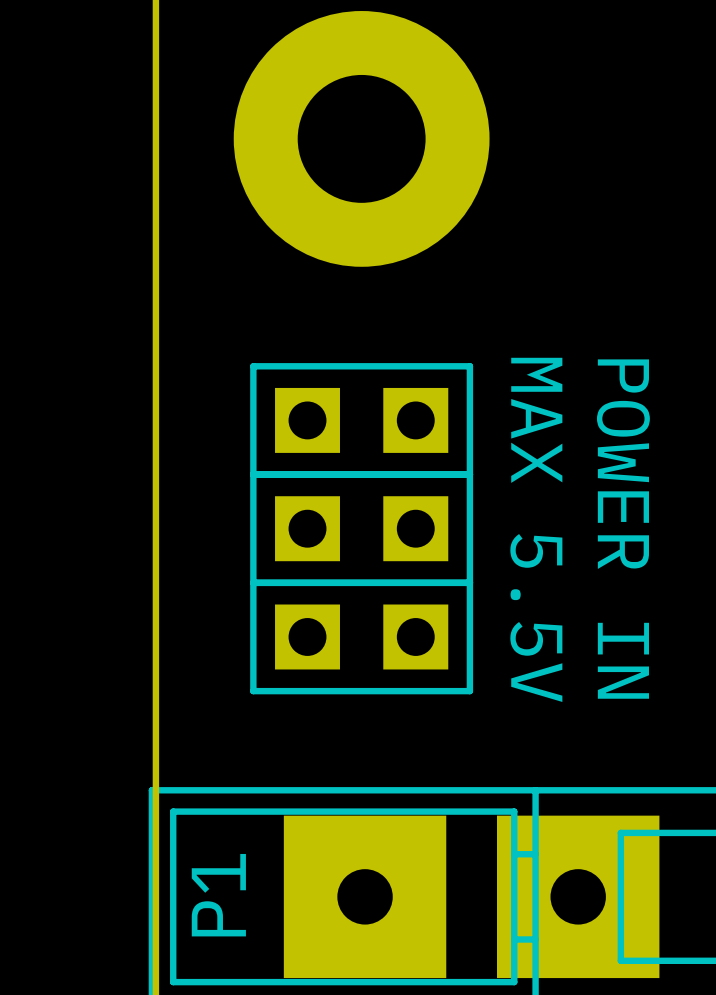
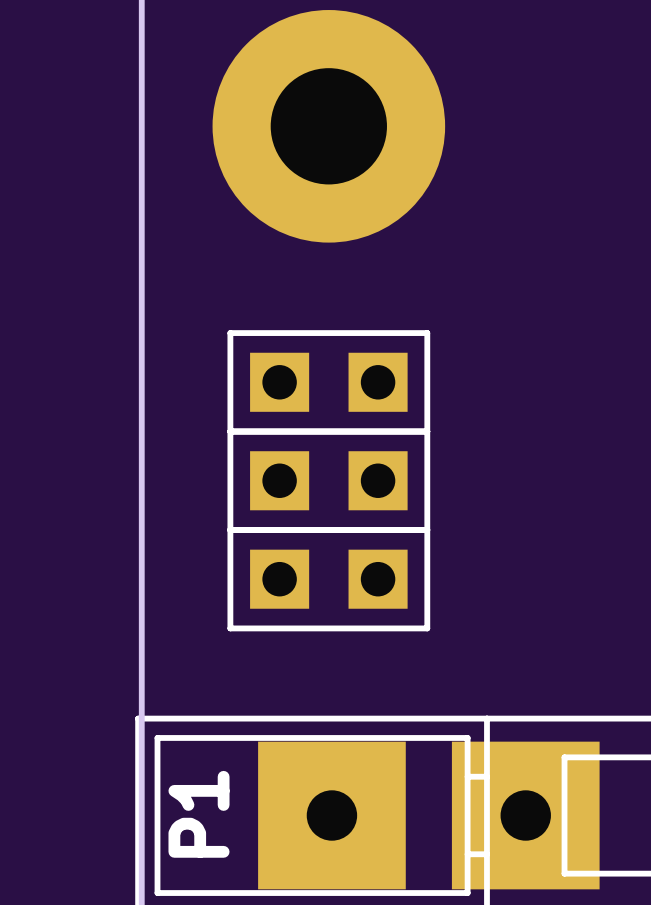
text: MAX 5.5V (536, 529) -> none
text: POWER IN (623, 529) -> none

